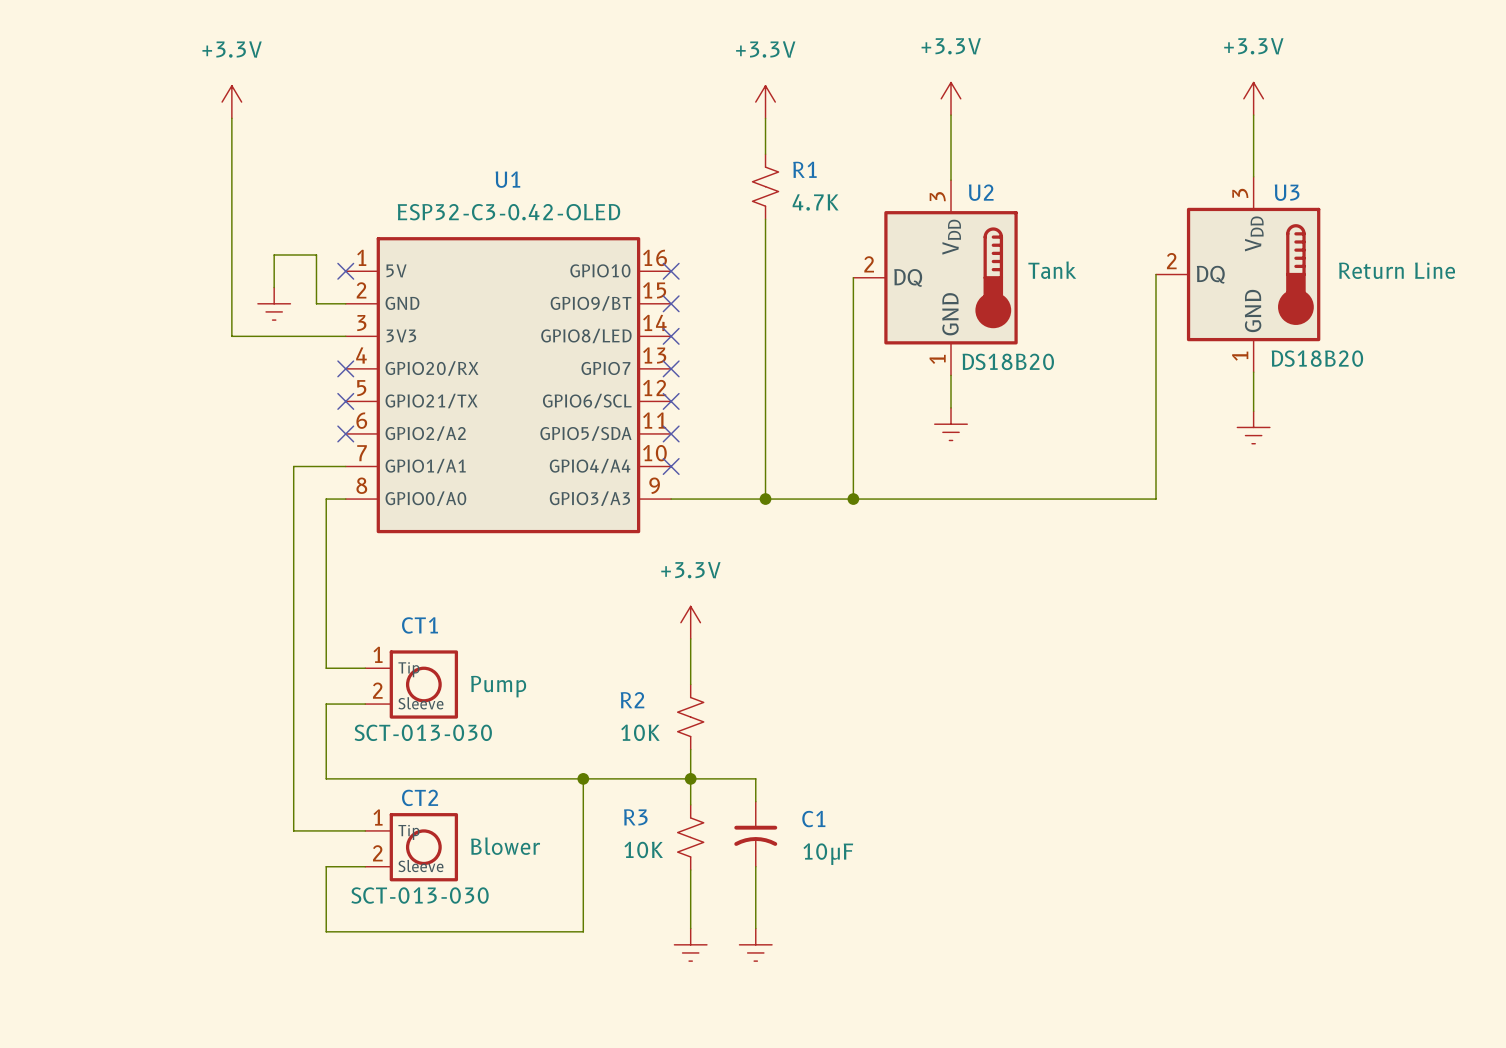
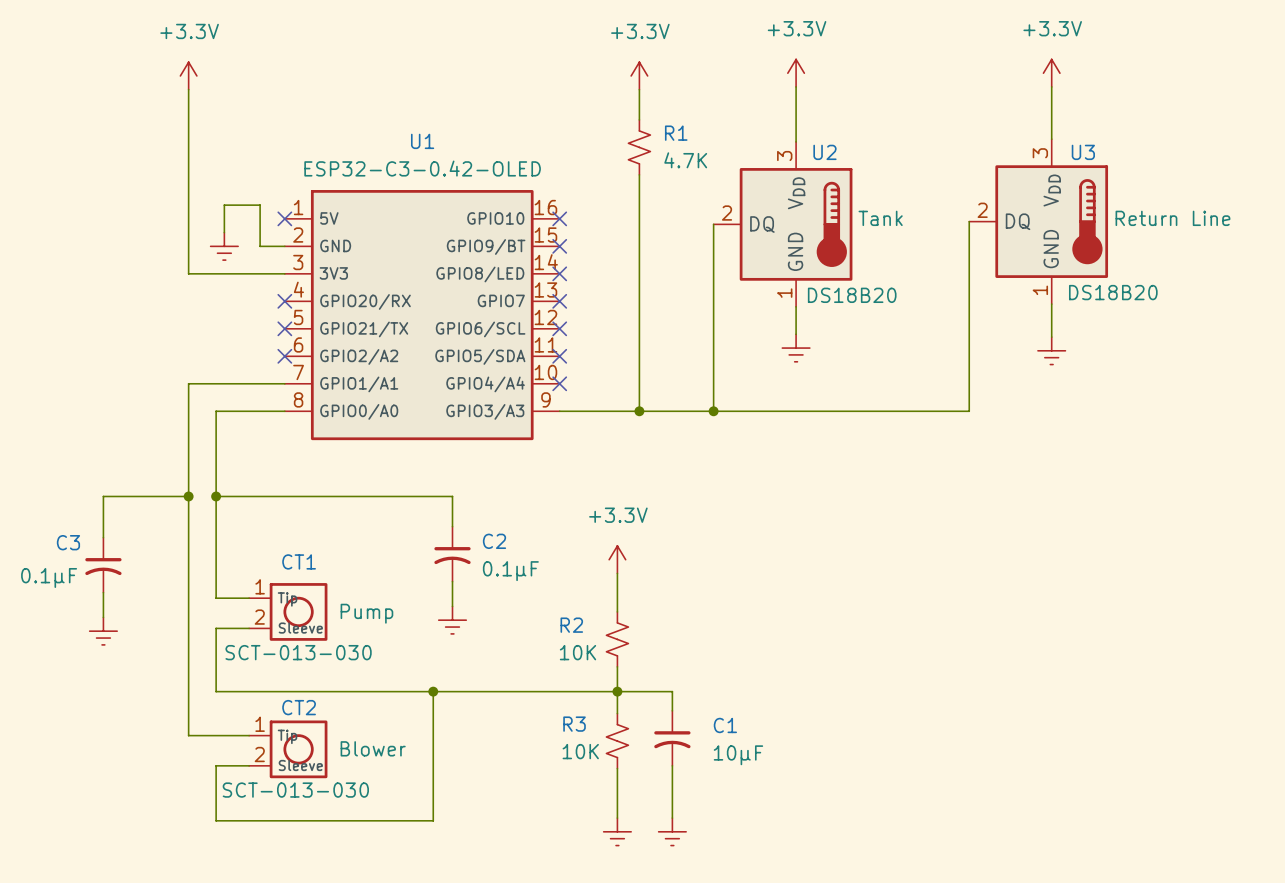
wire: (293, 466) (293, 830) -> (240, 383) (188, 383) (188, 735) (249, 735)
wire: (326, 499) (326, 668) (365, 668) -> (268, 411) (216, 411) (216, 598) (249, 598)
wire: none -> (188, 496) (103, 496) (103, 537)
junction: none -> (188, 496)
wire: none -> (216, 496) (452, 496) (452, 526)
junction: none -> (216, 496)
power symbol position: +3.3V (690, 622) -> +3.3V (617, 559)
wire: (690, 638) (690, 684) -> (617, 573) (617, 611)
C2: none -> 0.1μF (452, 554)
C3: none -> 0.1μF (103, 565)
CT1 position: (411, 684) -> (288, 611)
wire: none -> (452, 581) (452, 606)
wire: (365, 704) (326, 704) (326, 778) (755, 778) (755, 801) -> none
wire: none -> (103, 592) (103, 617)
R2 position: (690, 717) -> (617, 639)
power symbol: none -> (452, 620)
wire: (690, 749) (690, 804) -> (617, 666) (617, 713)
wire: none -> (249, 628) (216, 628) (216, 691) (240, 691)
power symbol: none -> (103, 631)
wire: (583, 778) (583, 931) (326, 931) (326, 866) (365, 866) -> (433, 691) (433, 820) (216, 820) (216, 765) (249, 765)
junction: (583, 778) -> none
junction position: (690, 778) -> (617, 691)
wire: none -> (301, 691) (672, 691) (672, 710)
junction: none -> (433, 691)
C1 position: (755, 834) -> (672, 738)
R3 position: (690, 837) -> (617, 741)
CT2 position: (411, 847) -> (288, 749)
wire: (755, 866) (755, 928) -> (672, 765) (672, 818)
wire: (690, 869) (690, 928) -> (617, 768) (617, 818)
power symbol: (690, 944) -> none
power symbol: (755, 944) -> none
power symbol: none -> (617, 831)
power symbol: none -> (672, 831)

